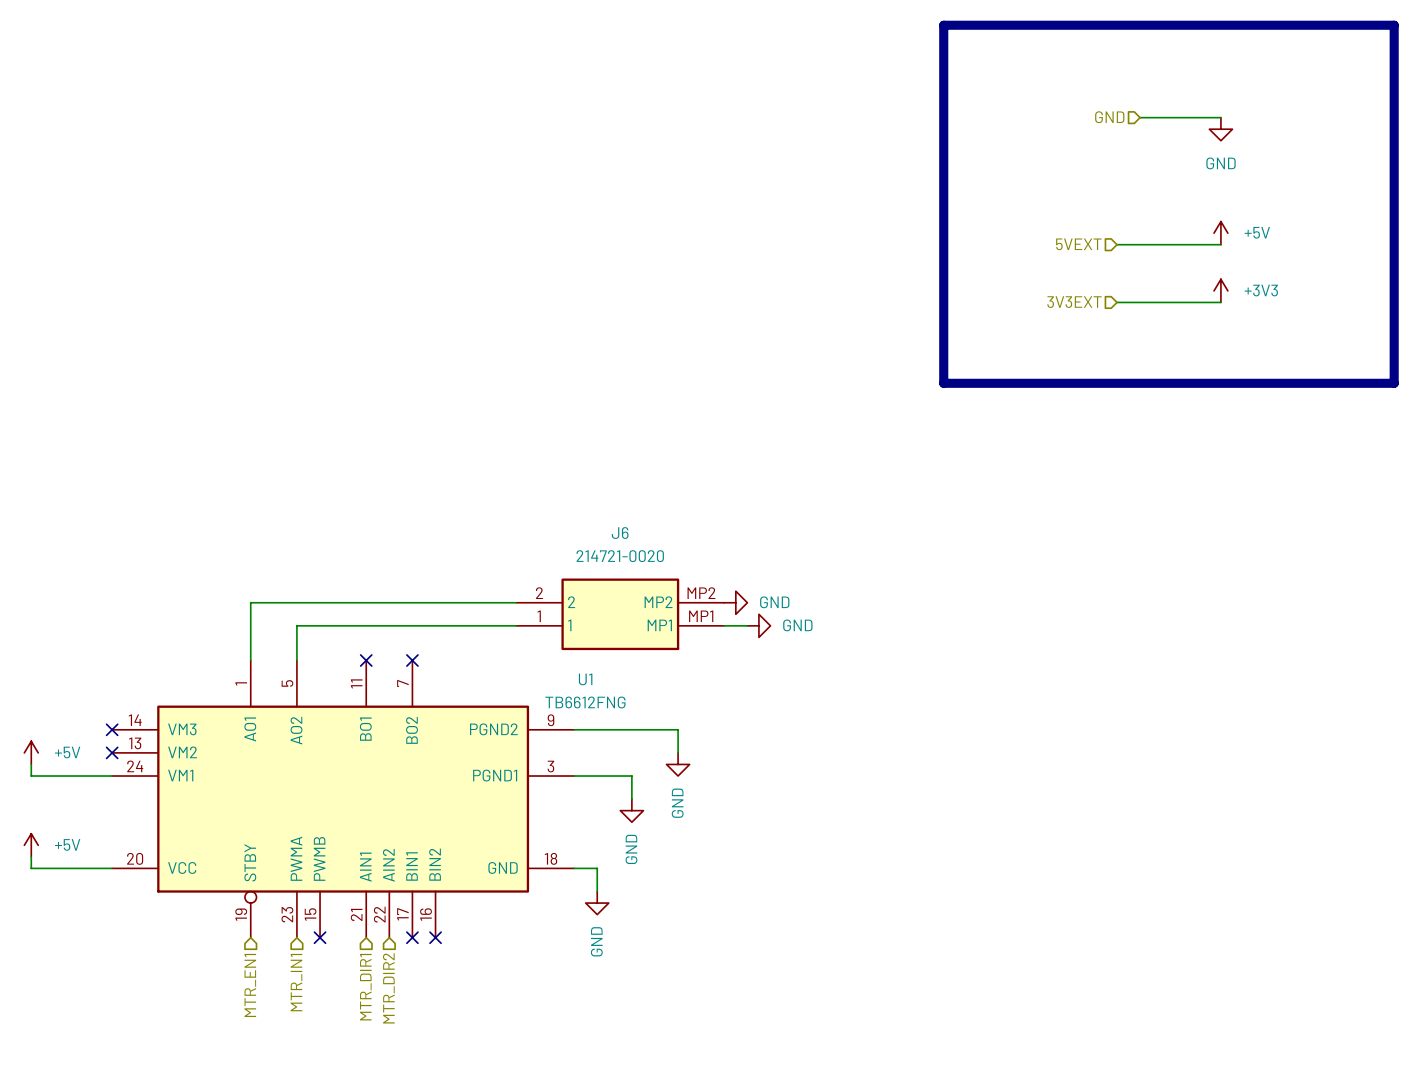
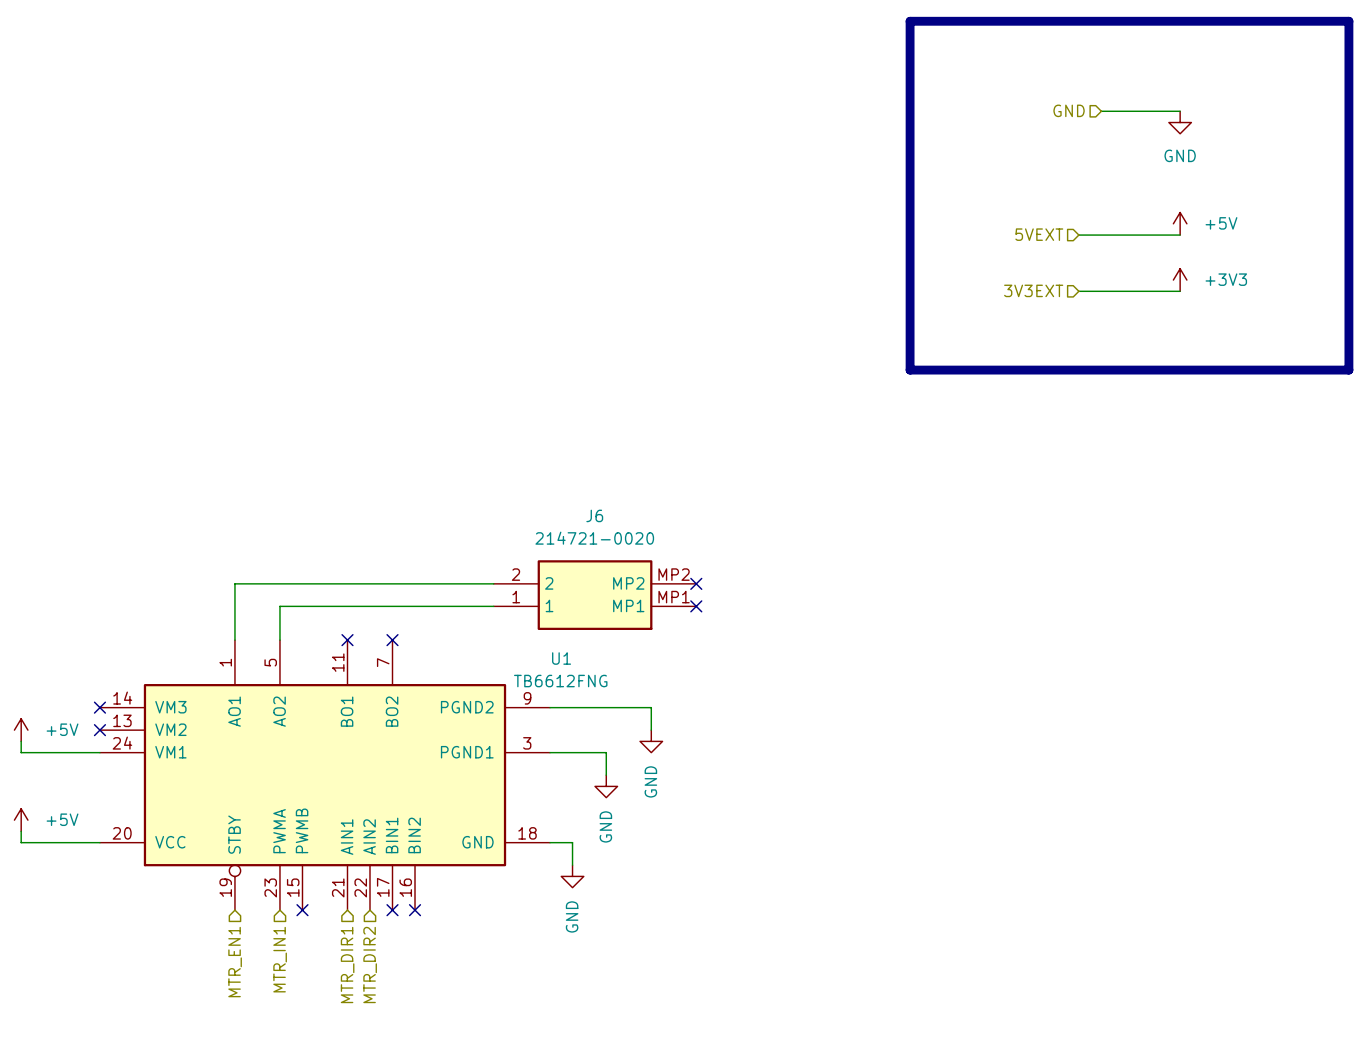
no-connect mark: none -> (696, 583)
power symbol: GND (735, 602) -> none
wire: (724, 625) (747, 625) -> none
no-connect mark: none -> (696, 606)
power symbol: GND (758, 625) -> none

